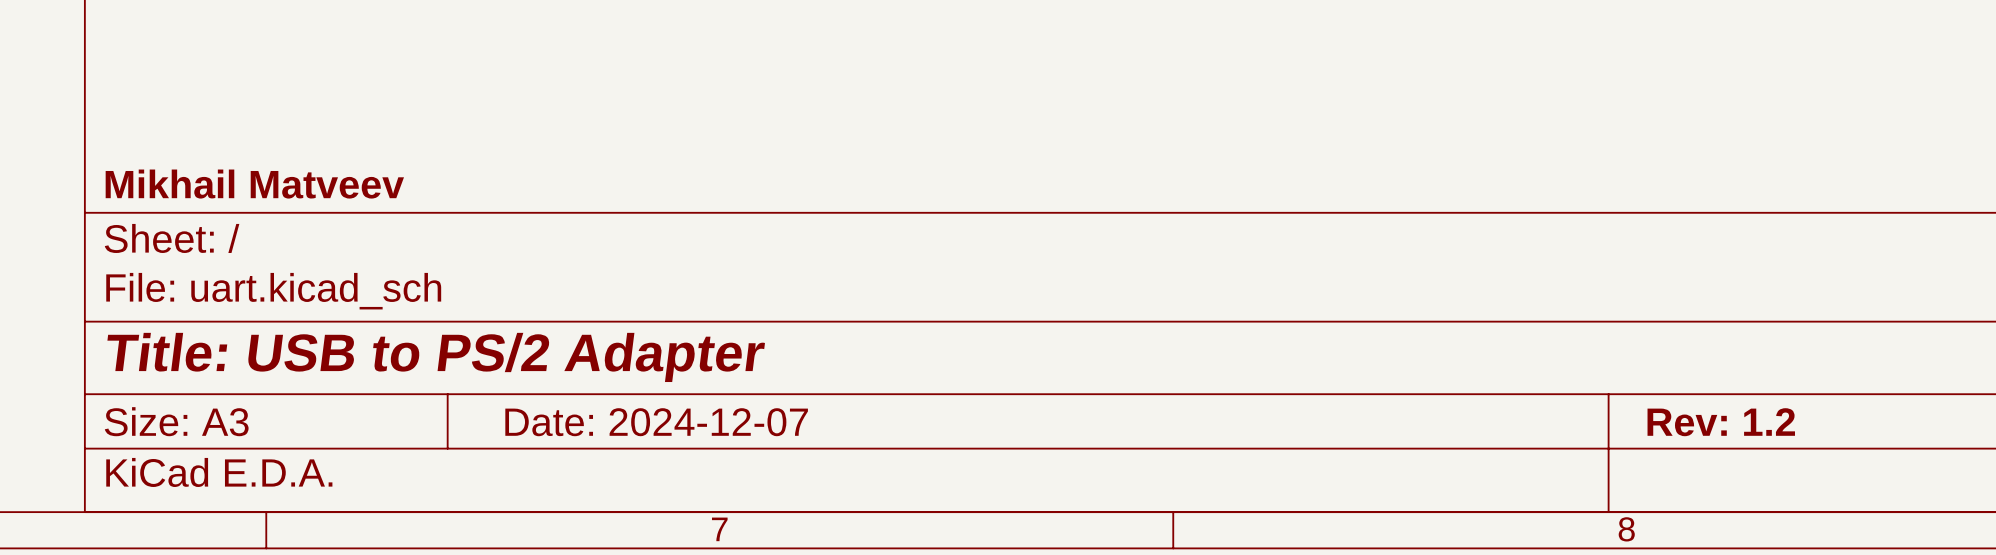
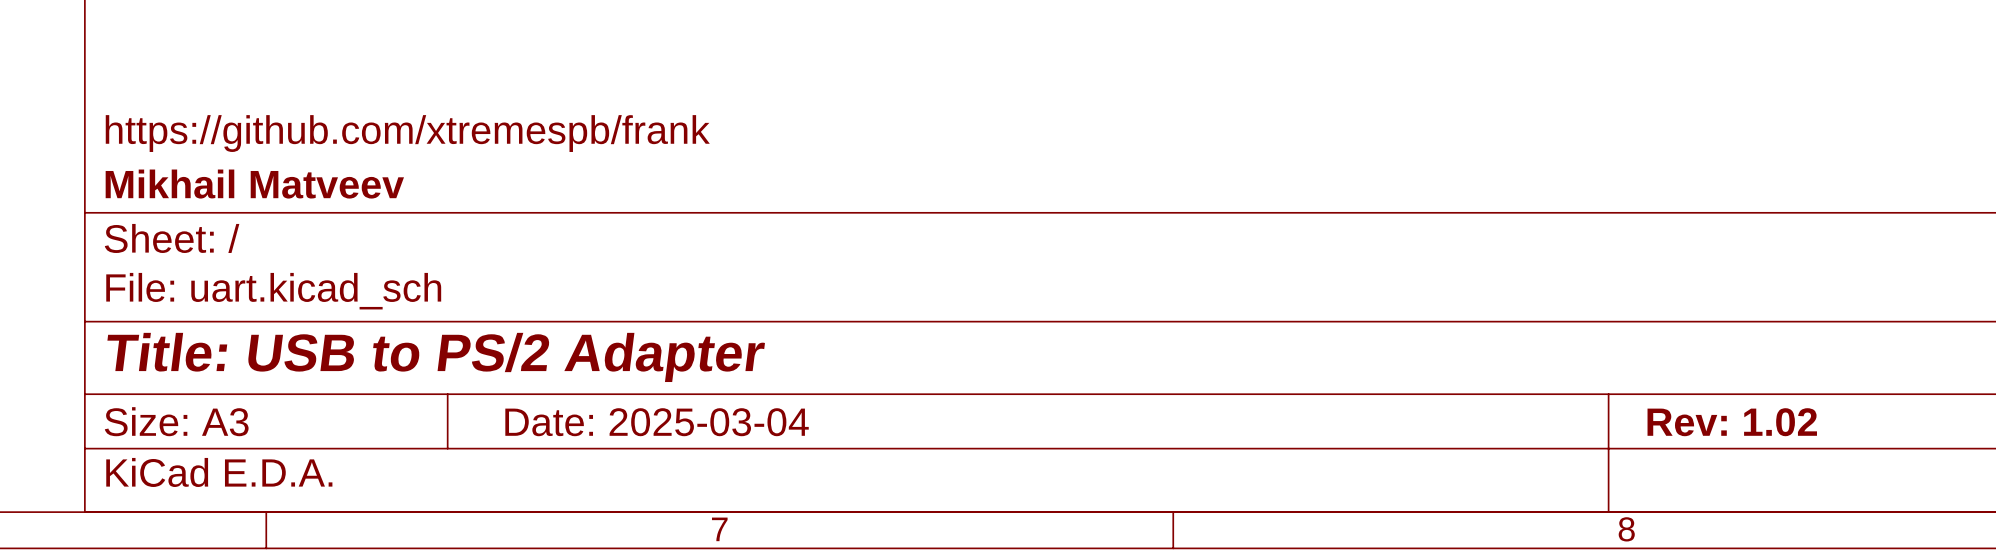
title block: none -> https://github.com/xtremespb/frank (407, 133)
title block: Date: 2024-12-07 (656, 422) -> Date: 2025-03-04 (657, 422)
title block: Rev: 1.2 (1721, 422) -> Rev: 1.02 (1732, 422)

